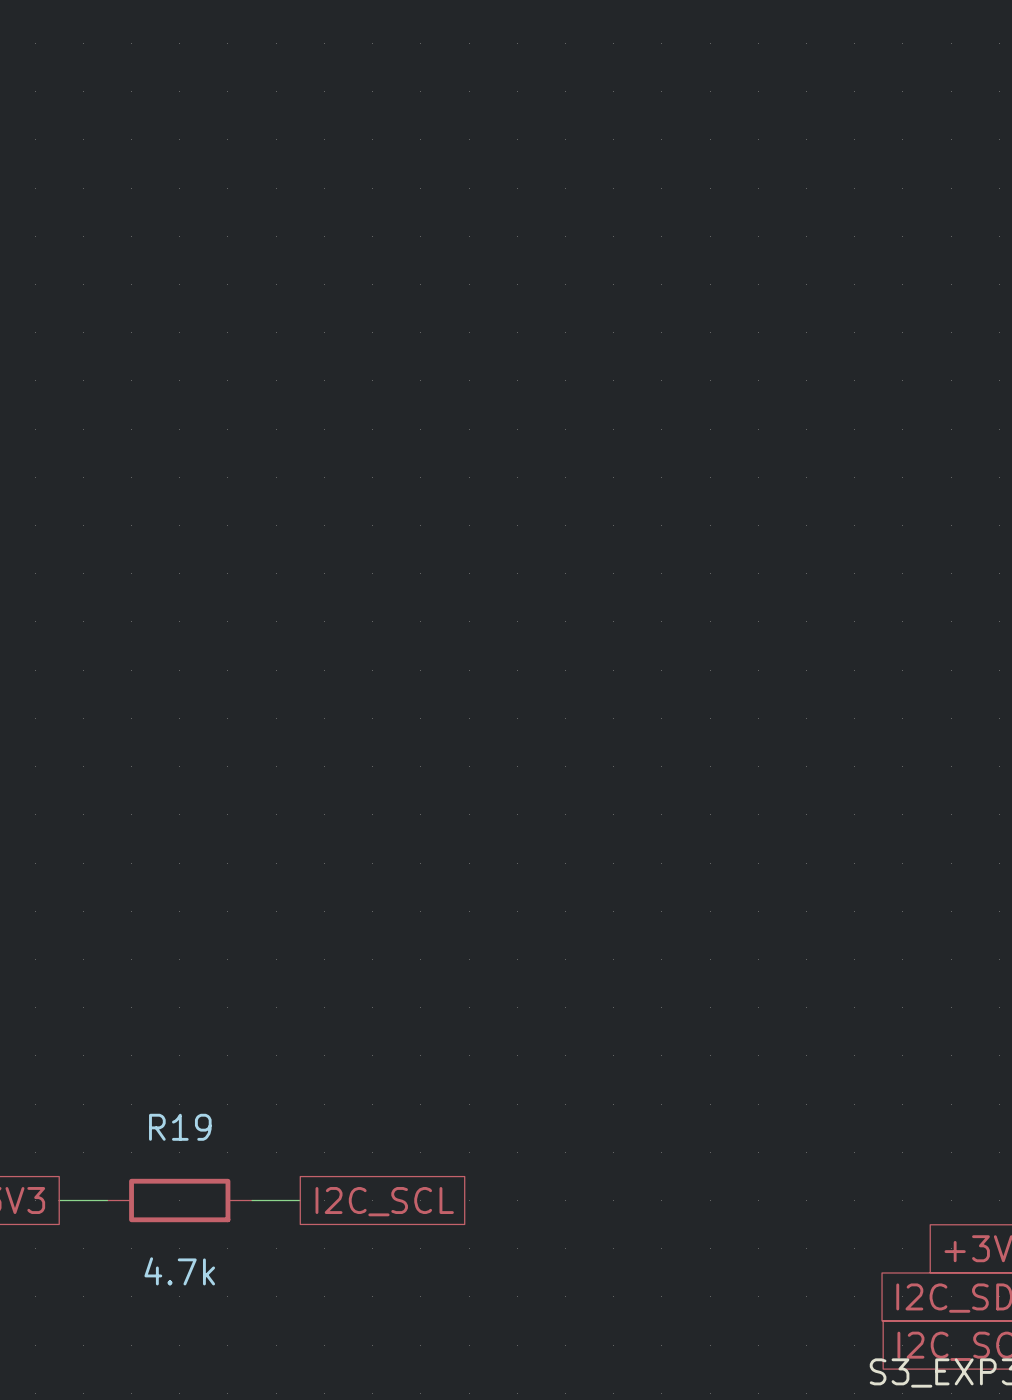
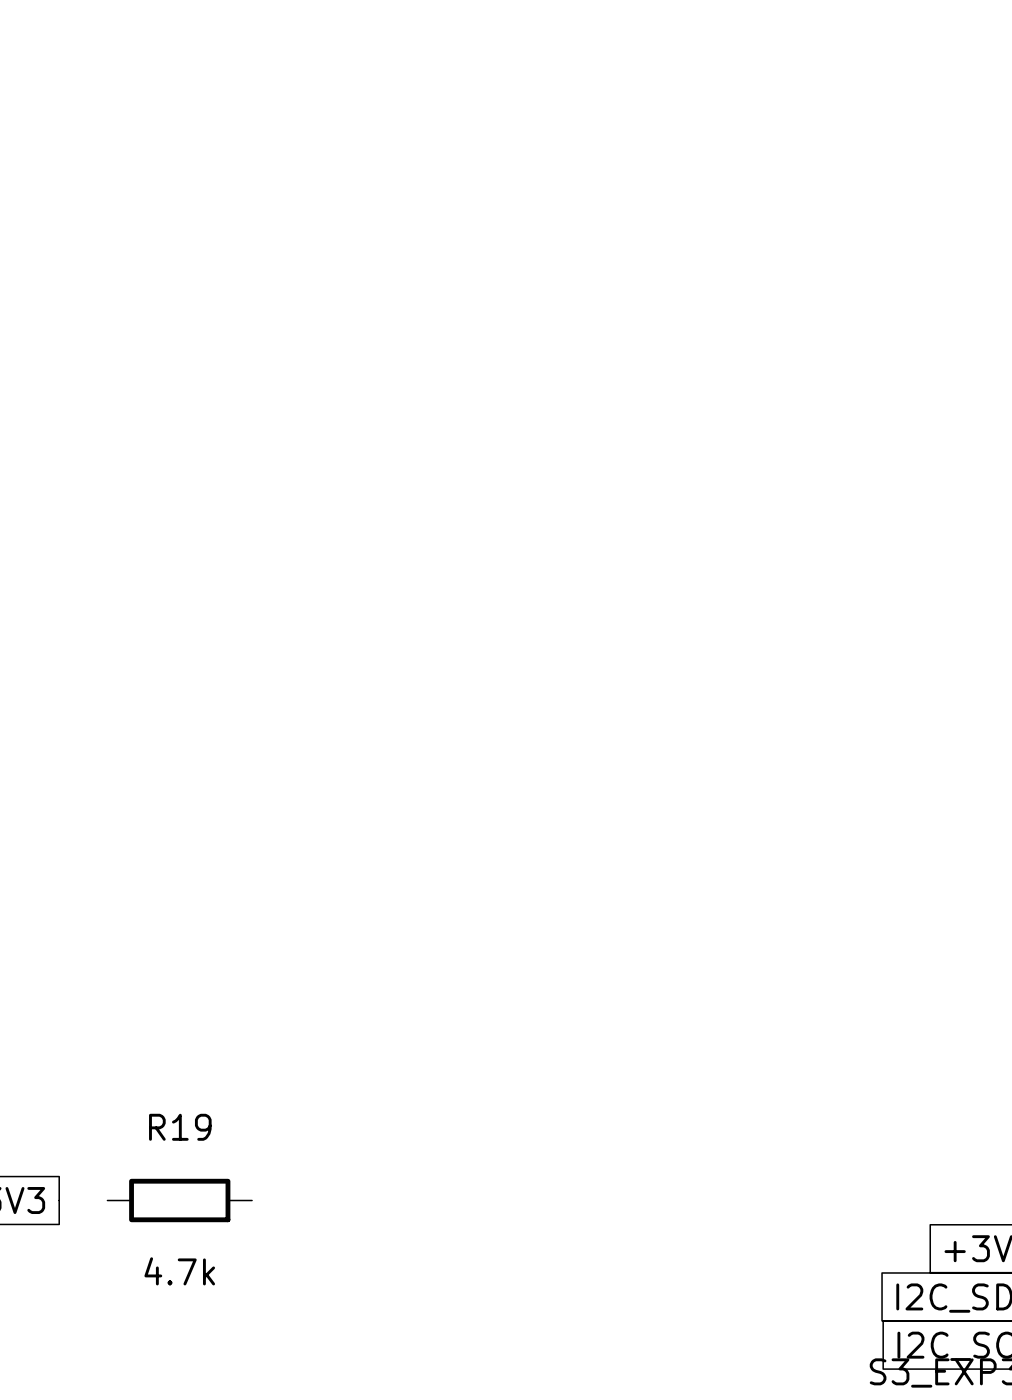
wire: (59, 1200) (107, 1200) -> none
wire: (252, 1200) (300, 1200) -> none
global label: I2C_SCL (384, 1201) -> none

